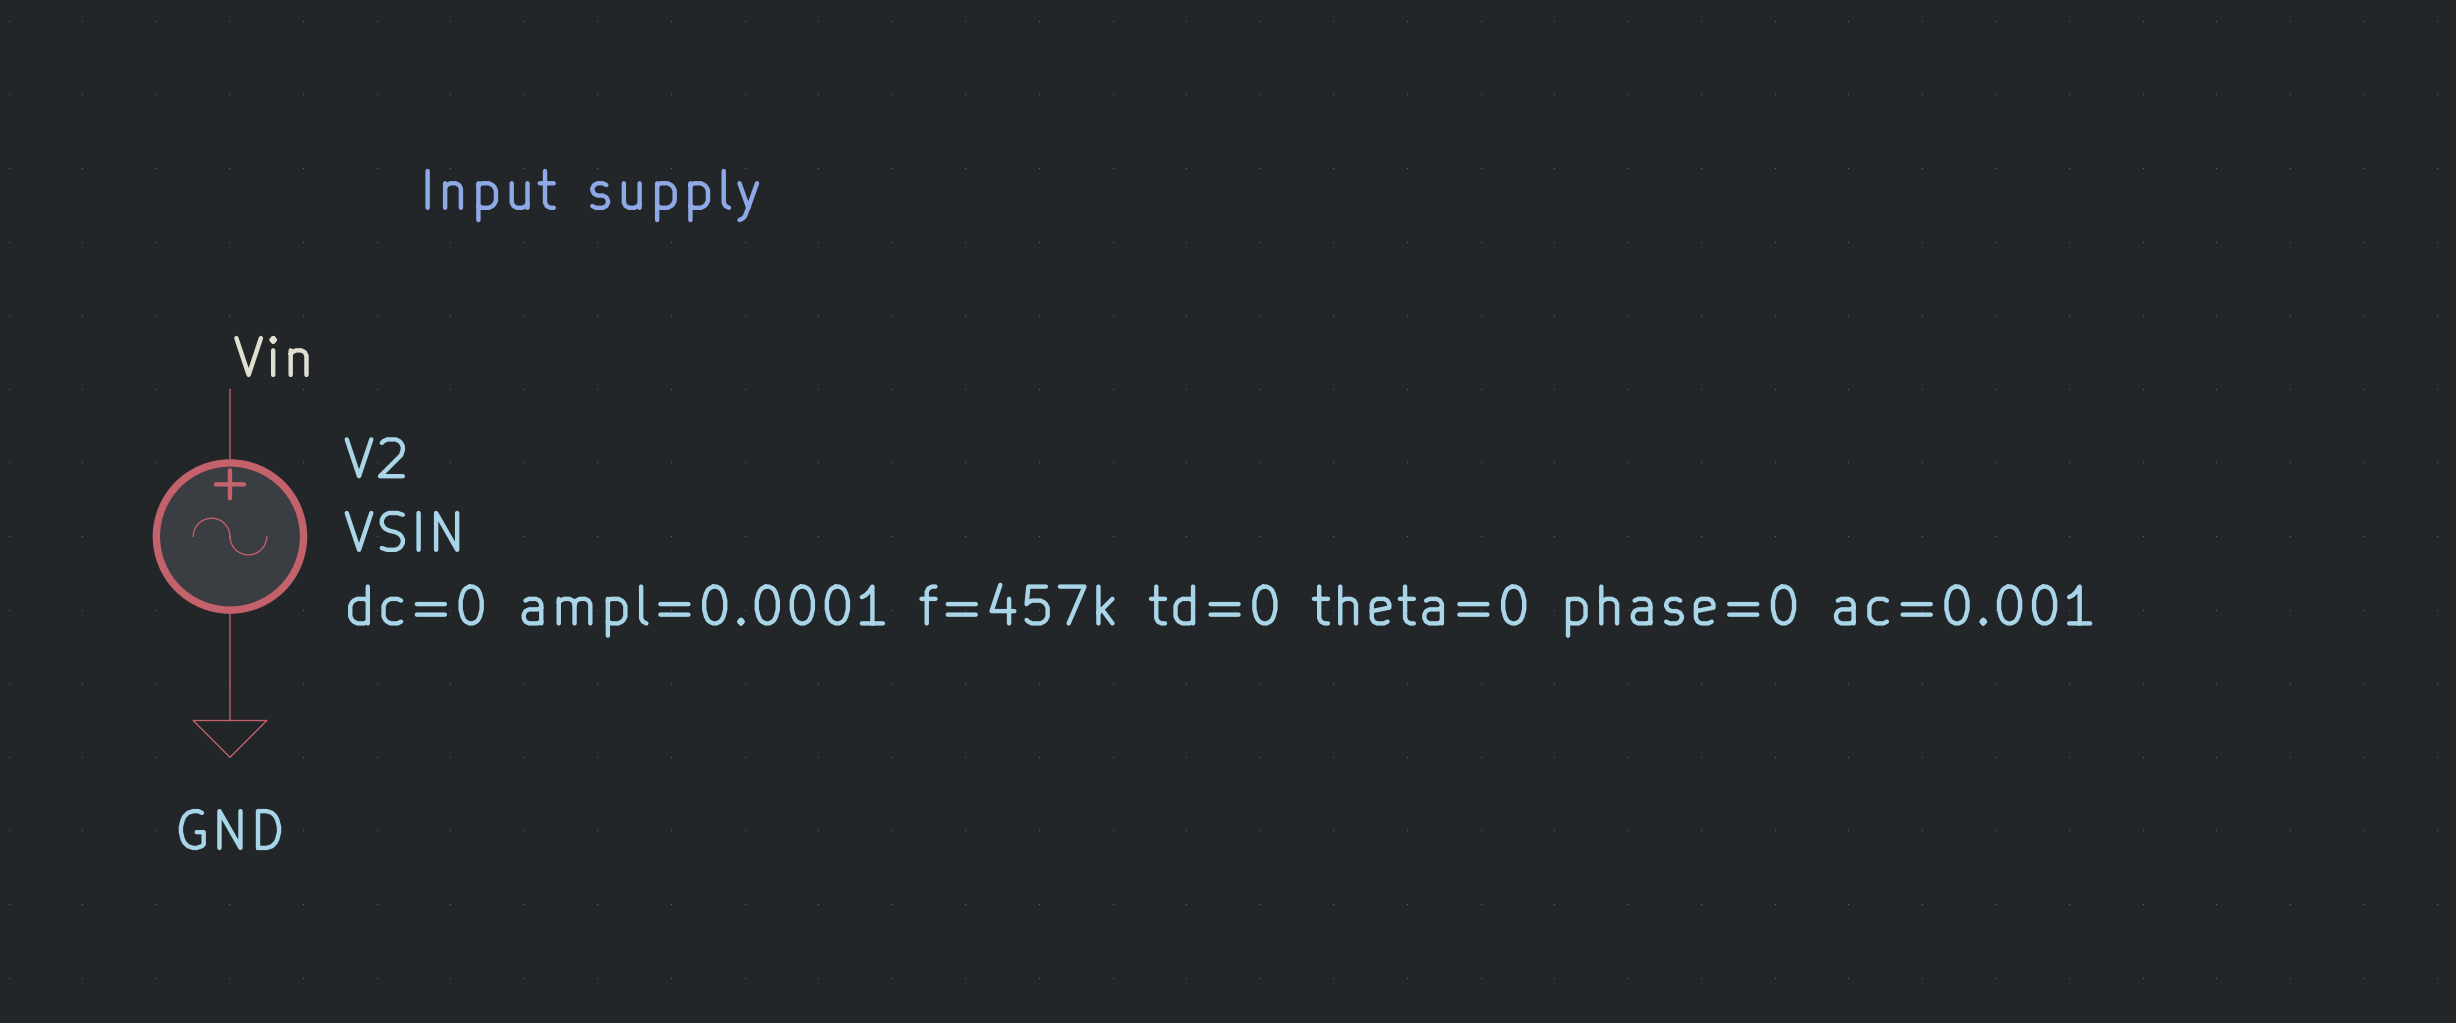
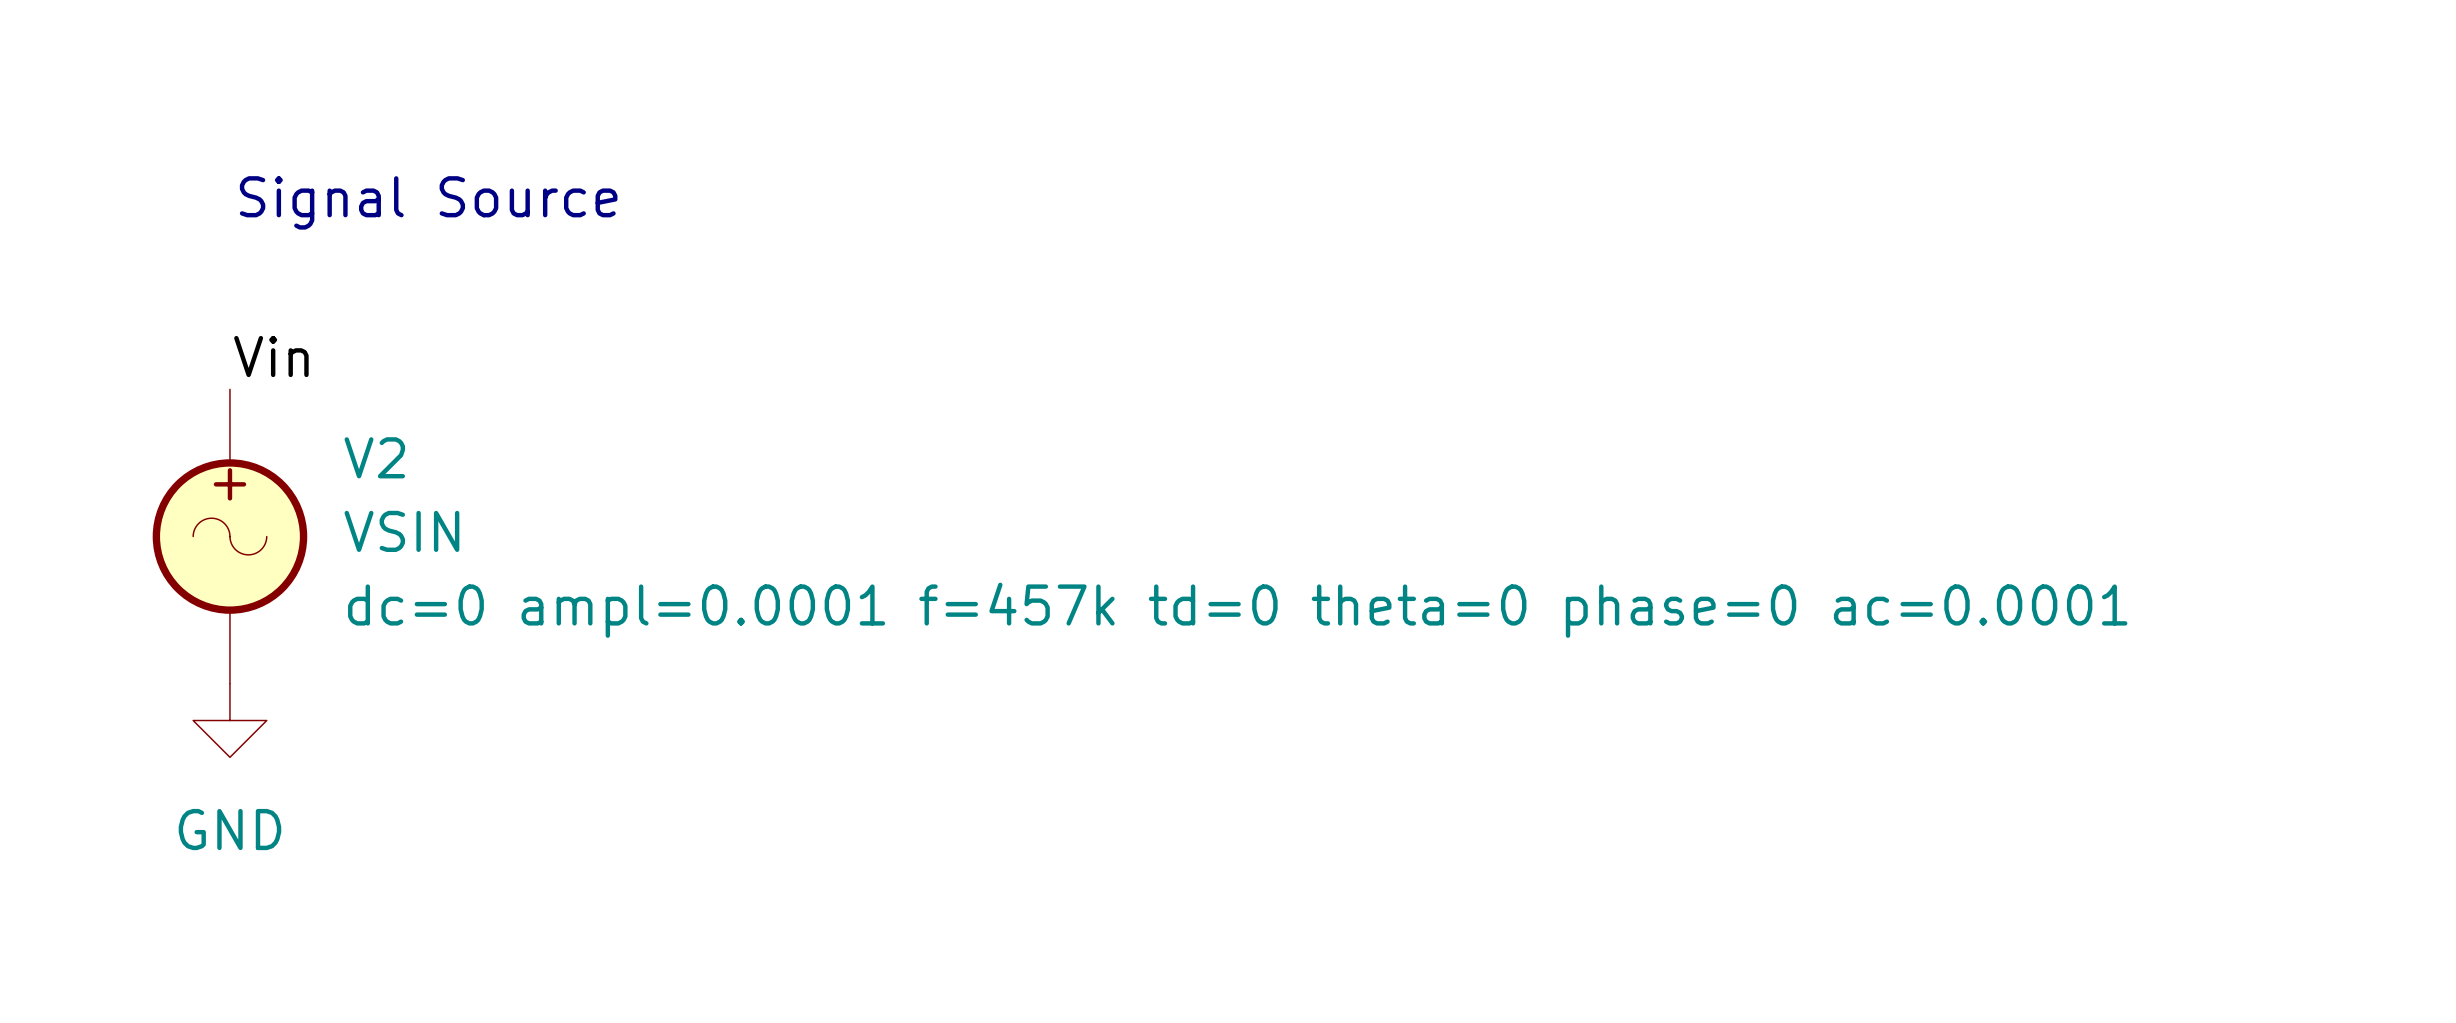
text: Input supply (592, 195) -> none
text: none -> Signal Source (428, 202)
V2 text: dc=0 ampl=0.0001 f=457k td=0 theta=0 phase=0 ac=0.001 (1220, 610) -> dc=0 ampl=0.0001 f=457k td=0 theta=0 phase=0 ac=0.0001 (1237, 610)

